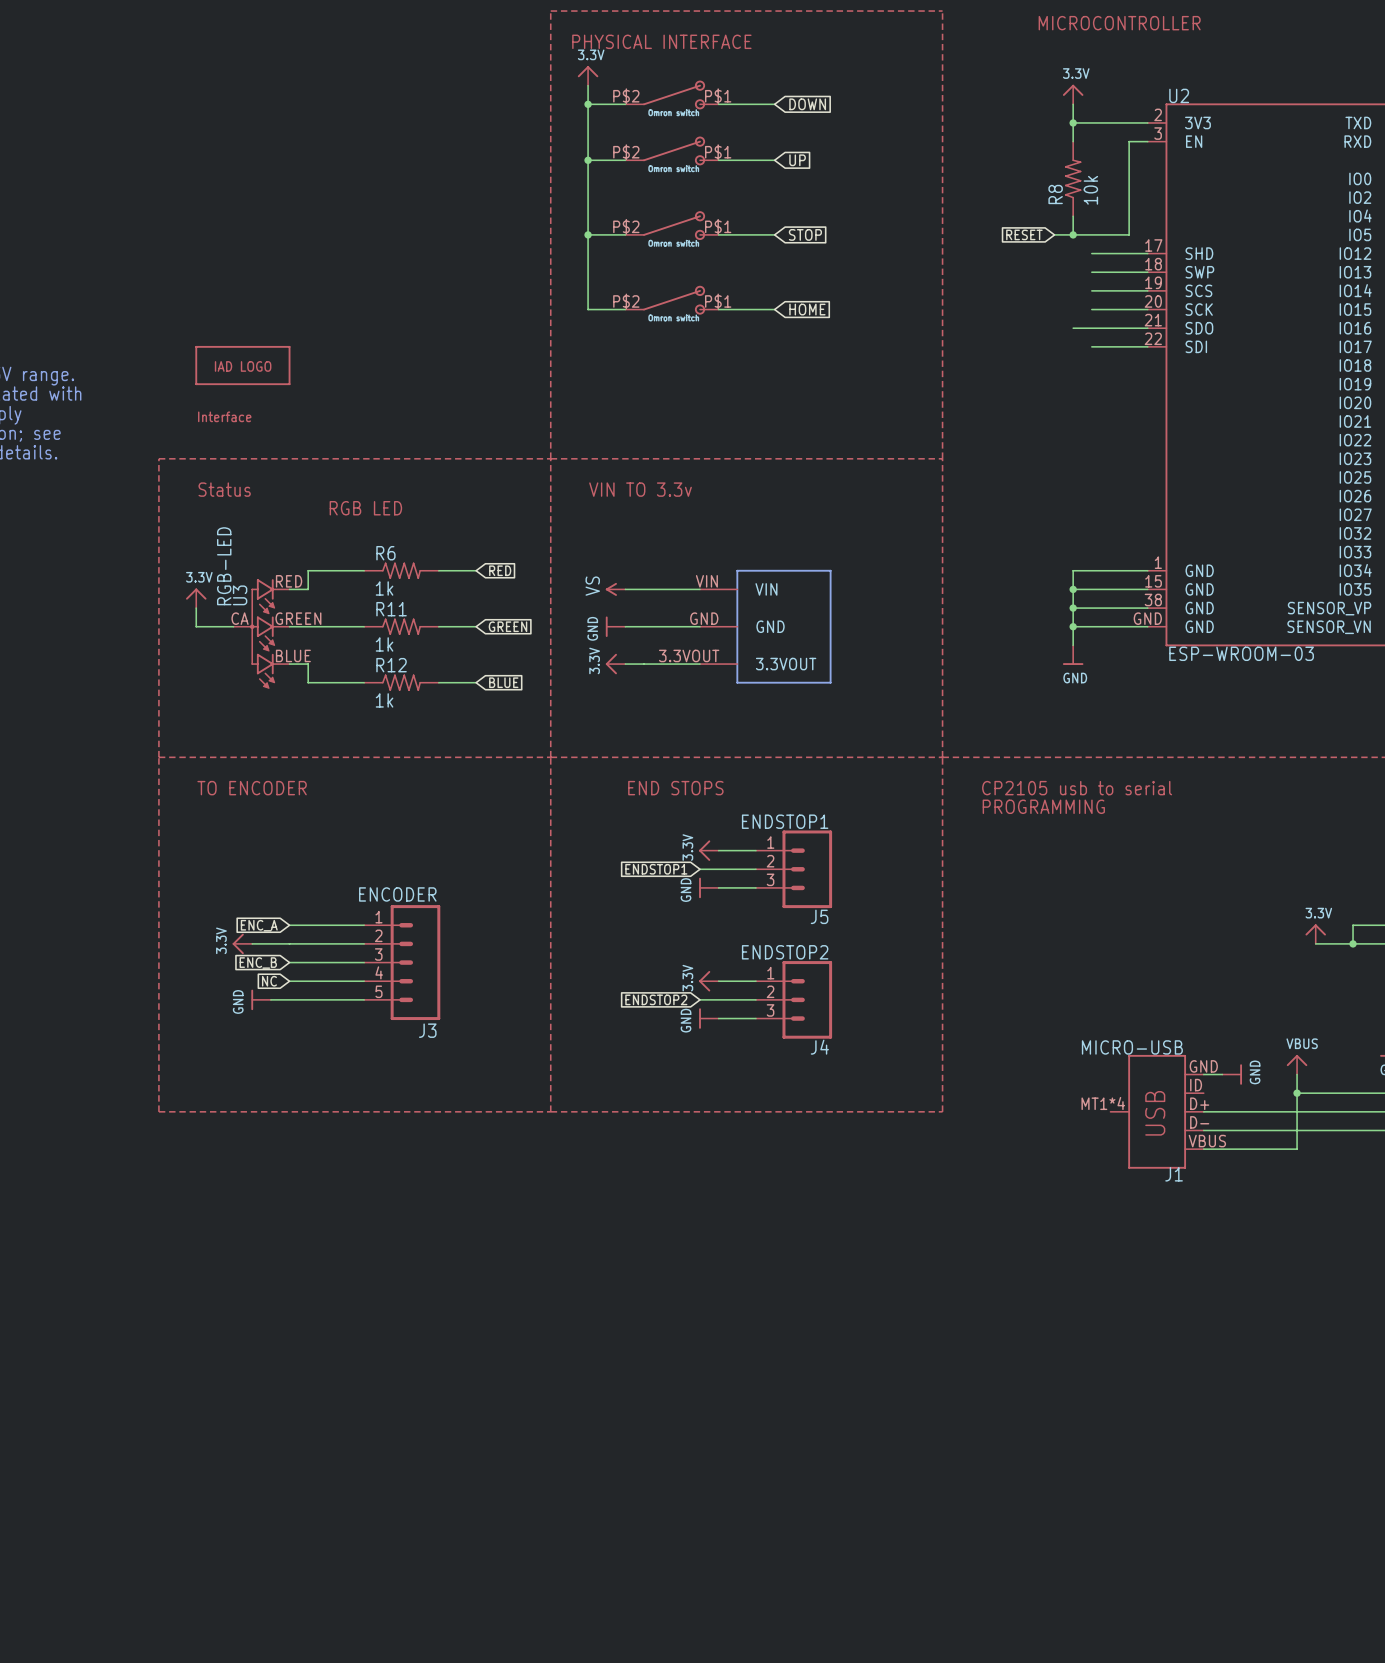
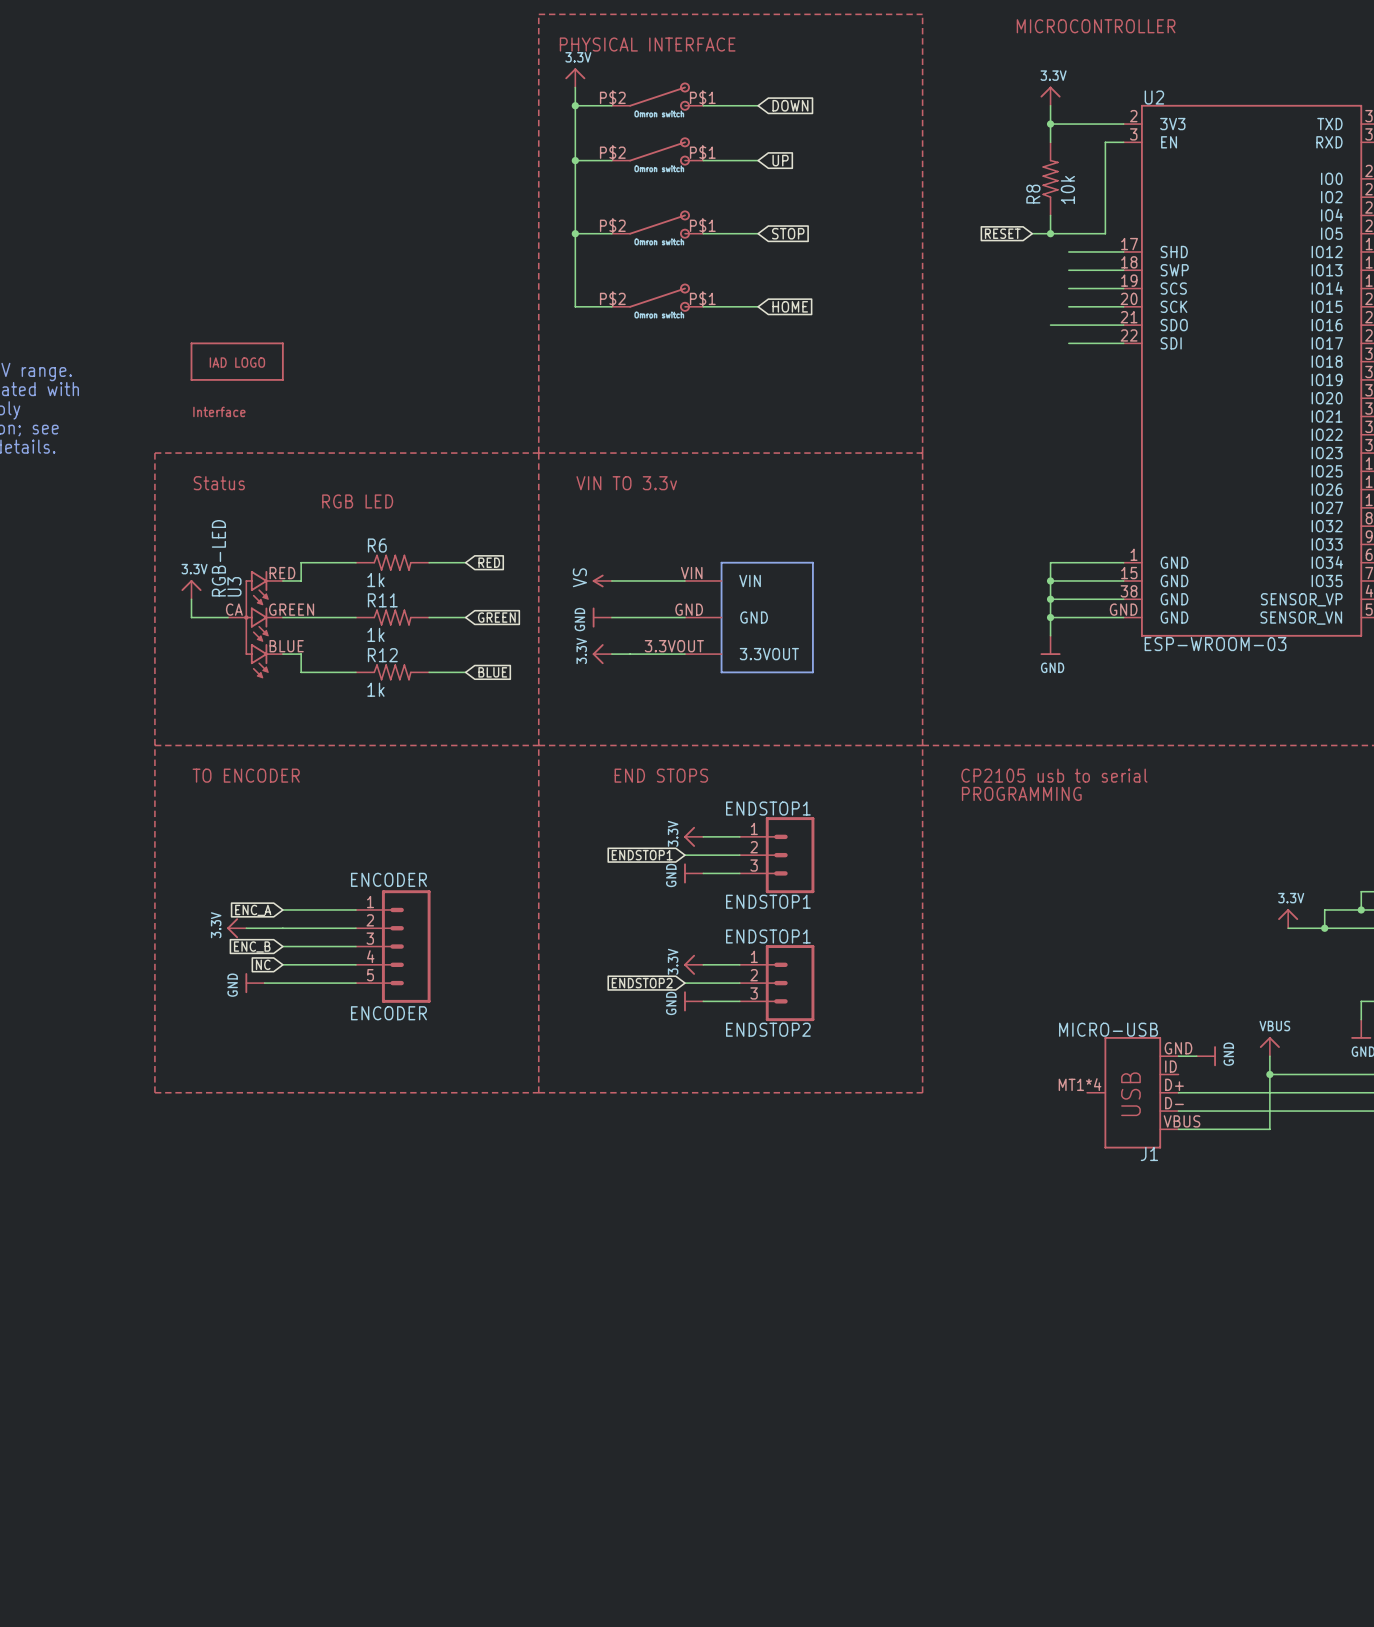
J5 name: J5 (819, 916) -> ENDSTOP1 (768, 901)
J4 value: ENDSTOP2 (785, 952) -> ENDSTOP1 (768, 936)
J3 name: J3 (427, 1030) -> ENCODER (388, 1013)
J4 name: J4 (819, 1047) -> ENDSTOP2 (768, 1029)

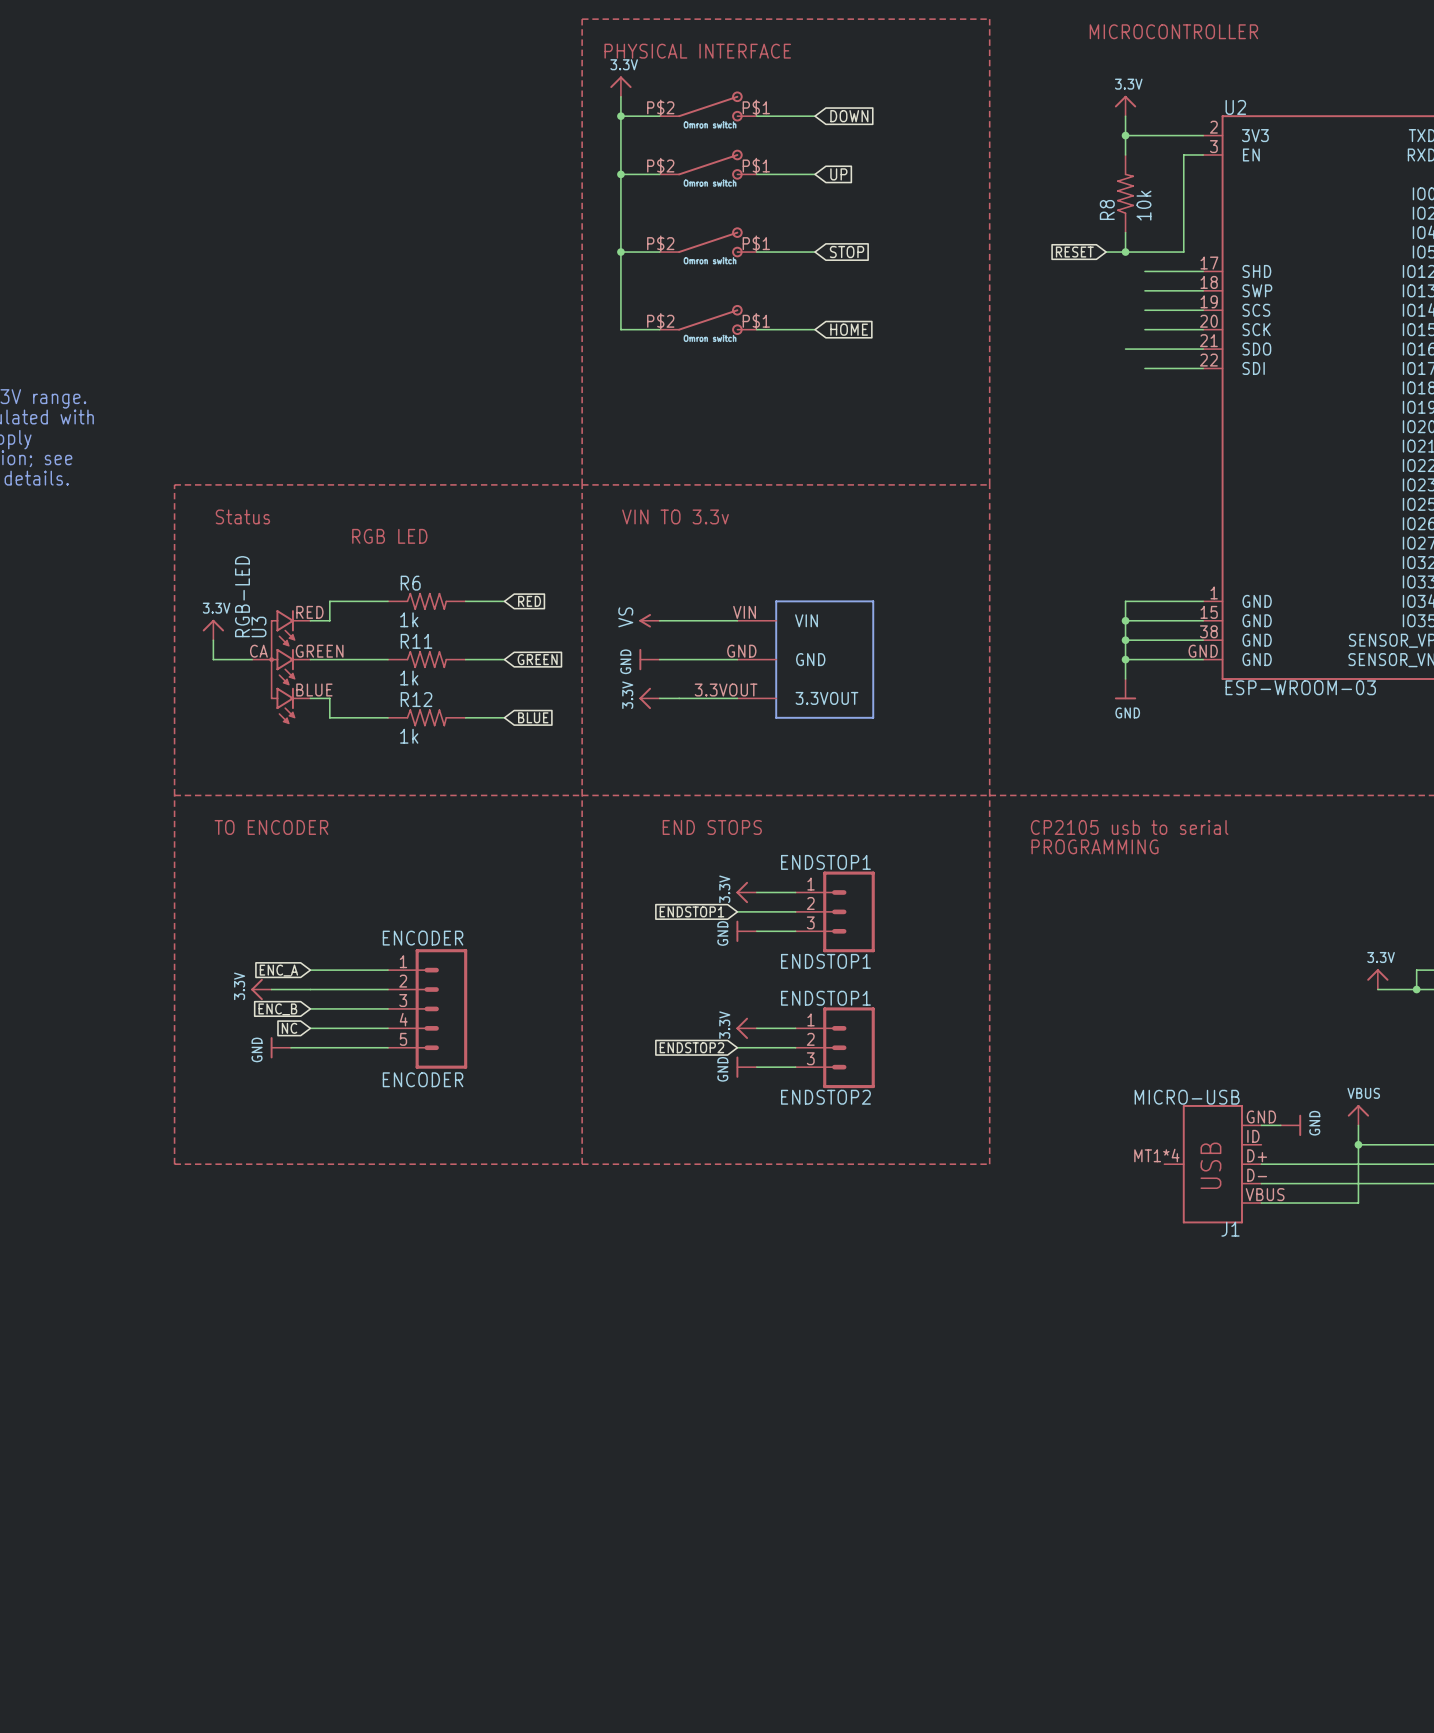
part: (237, 361) -> none
part: (219, 411) -> none

